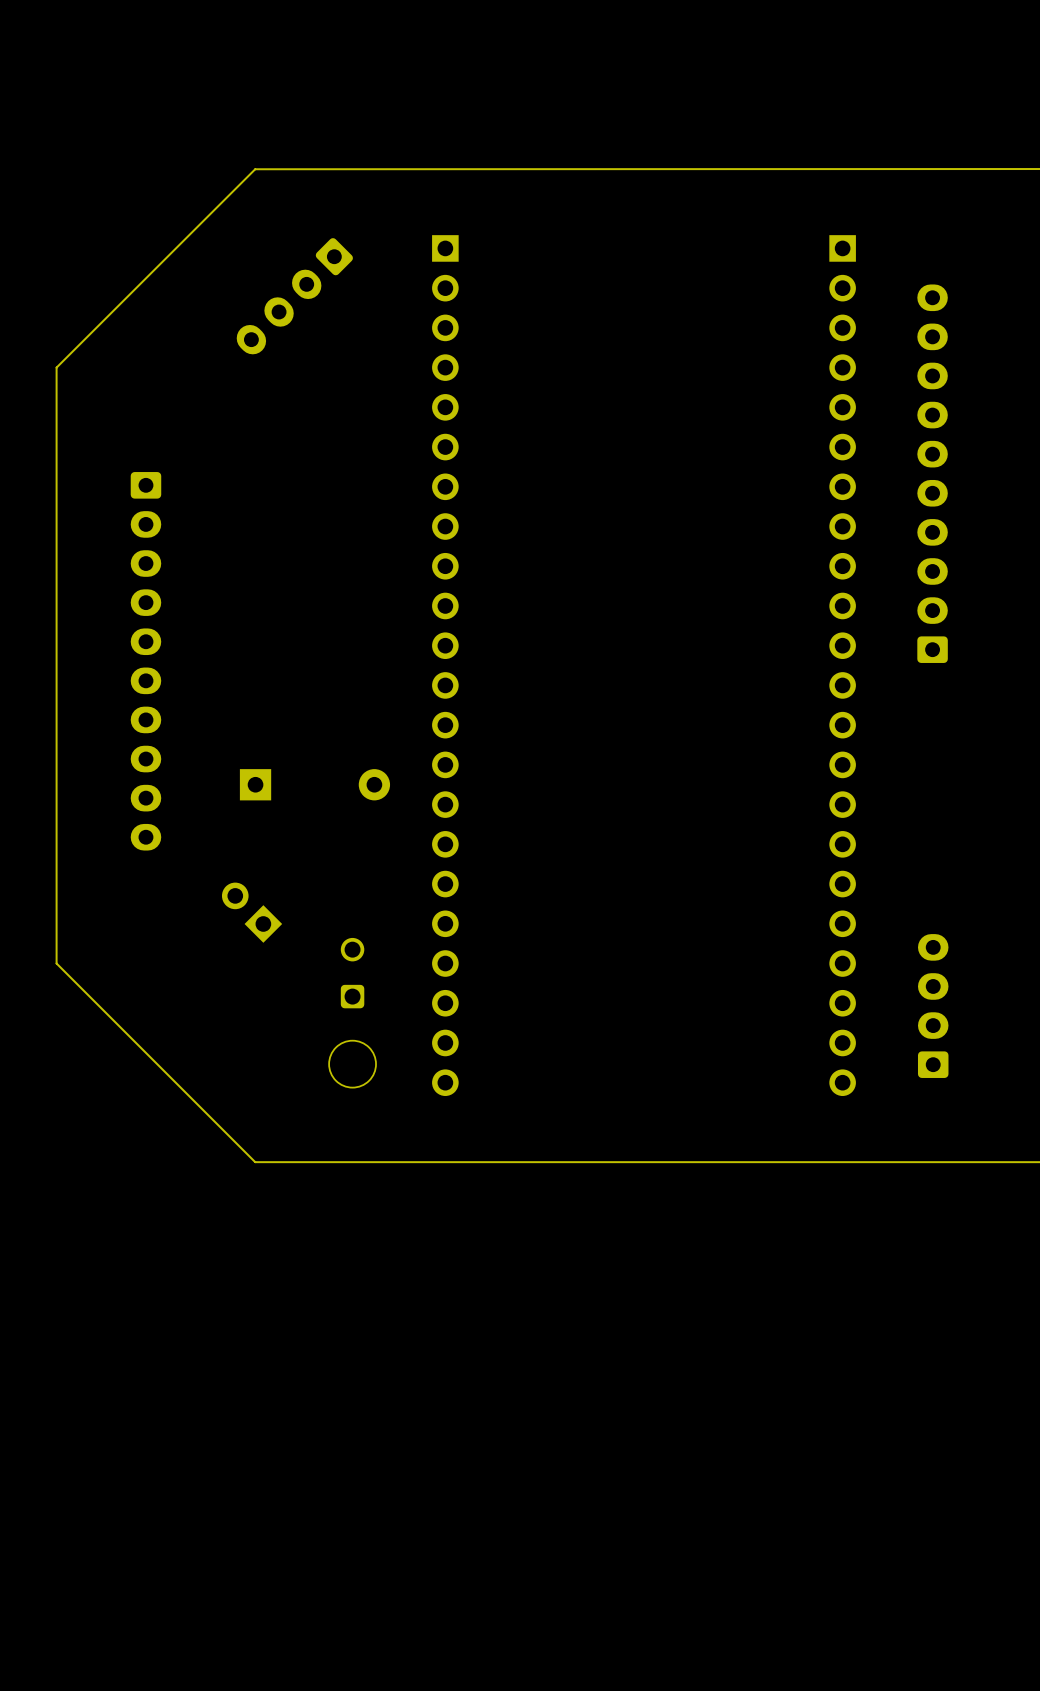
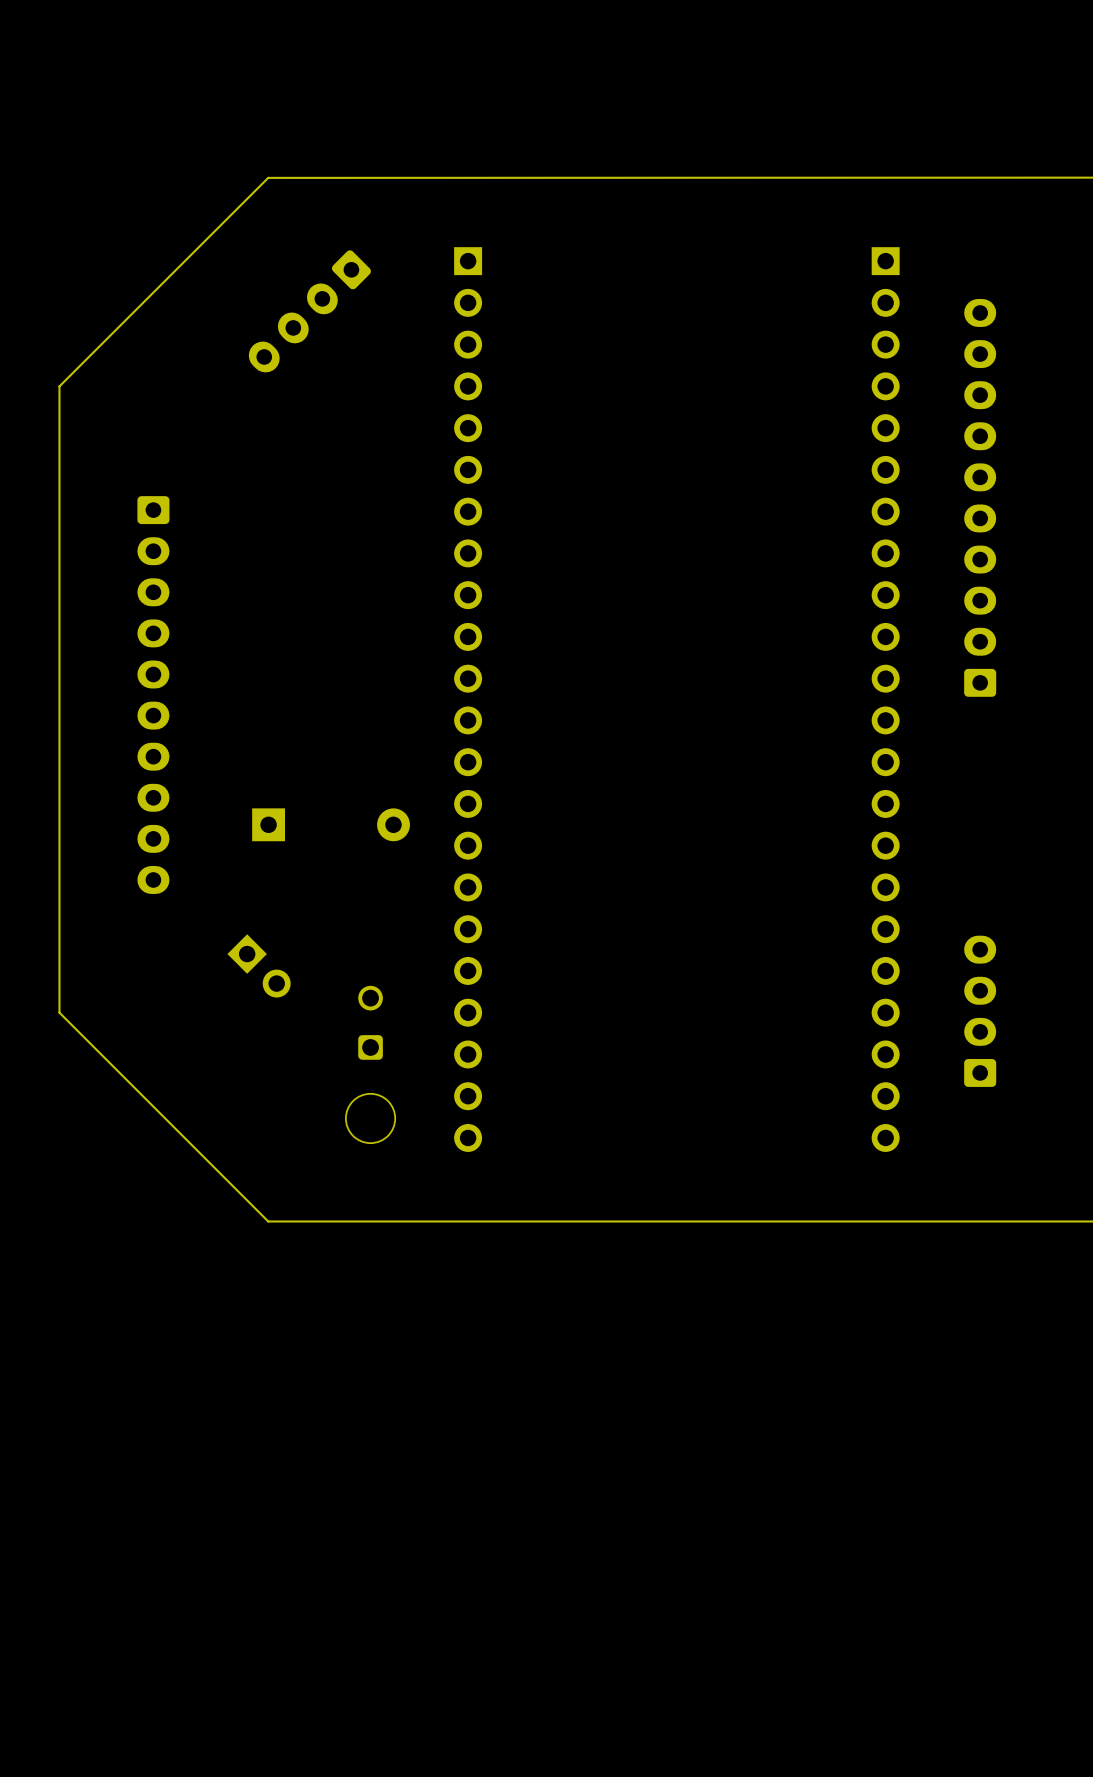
part rotation: 0° (252, 912) -> 180° (259, 965)
part position: (933, 1006) -> (980, 1011)

